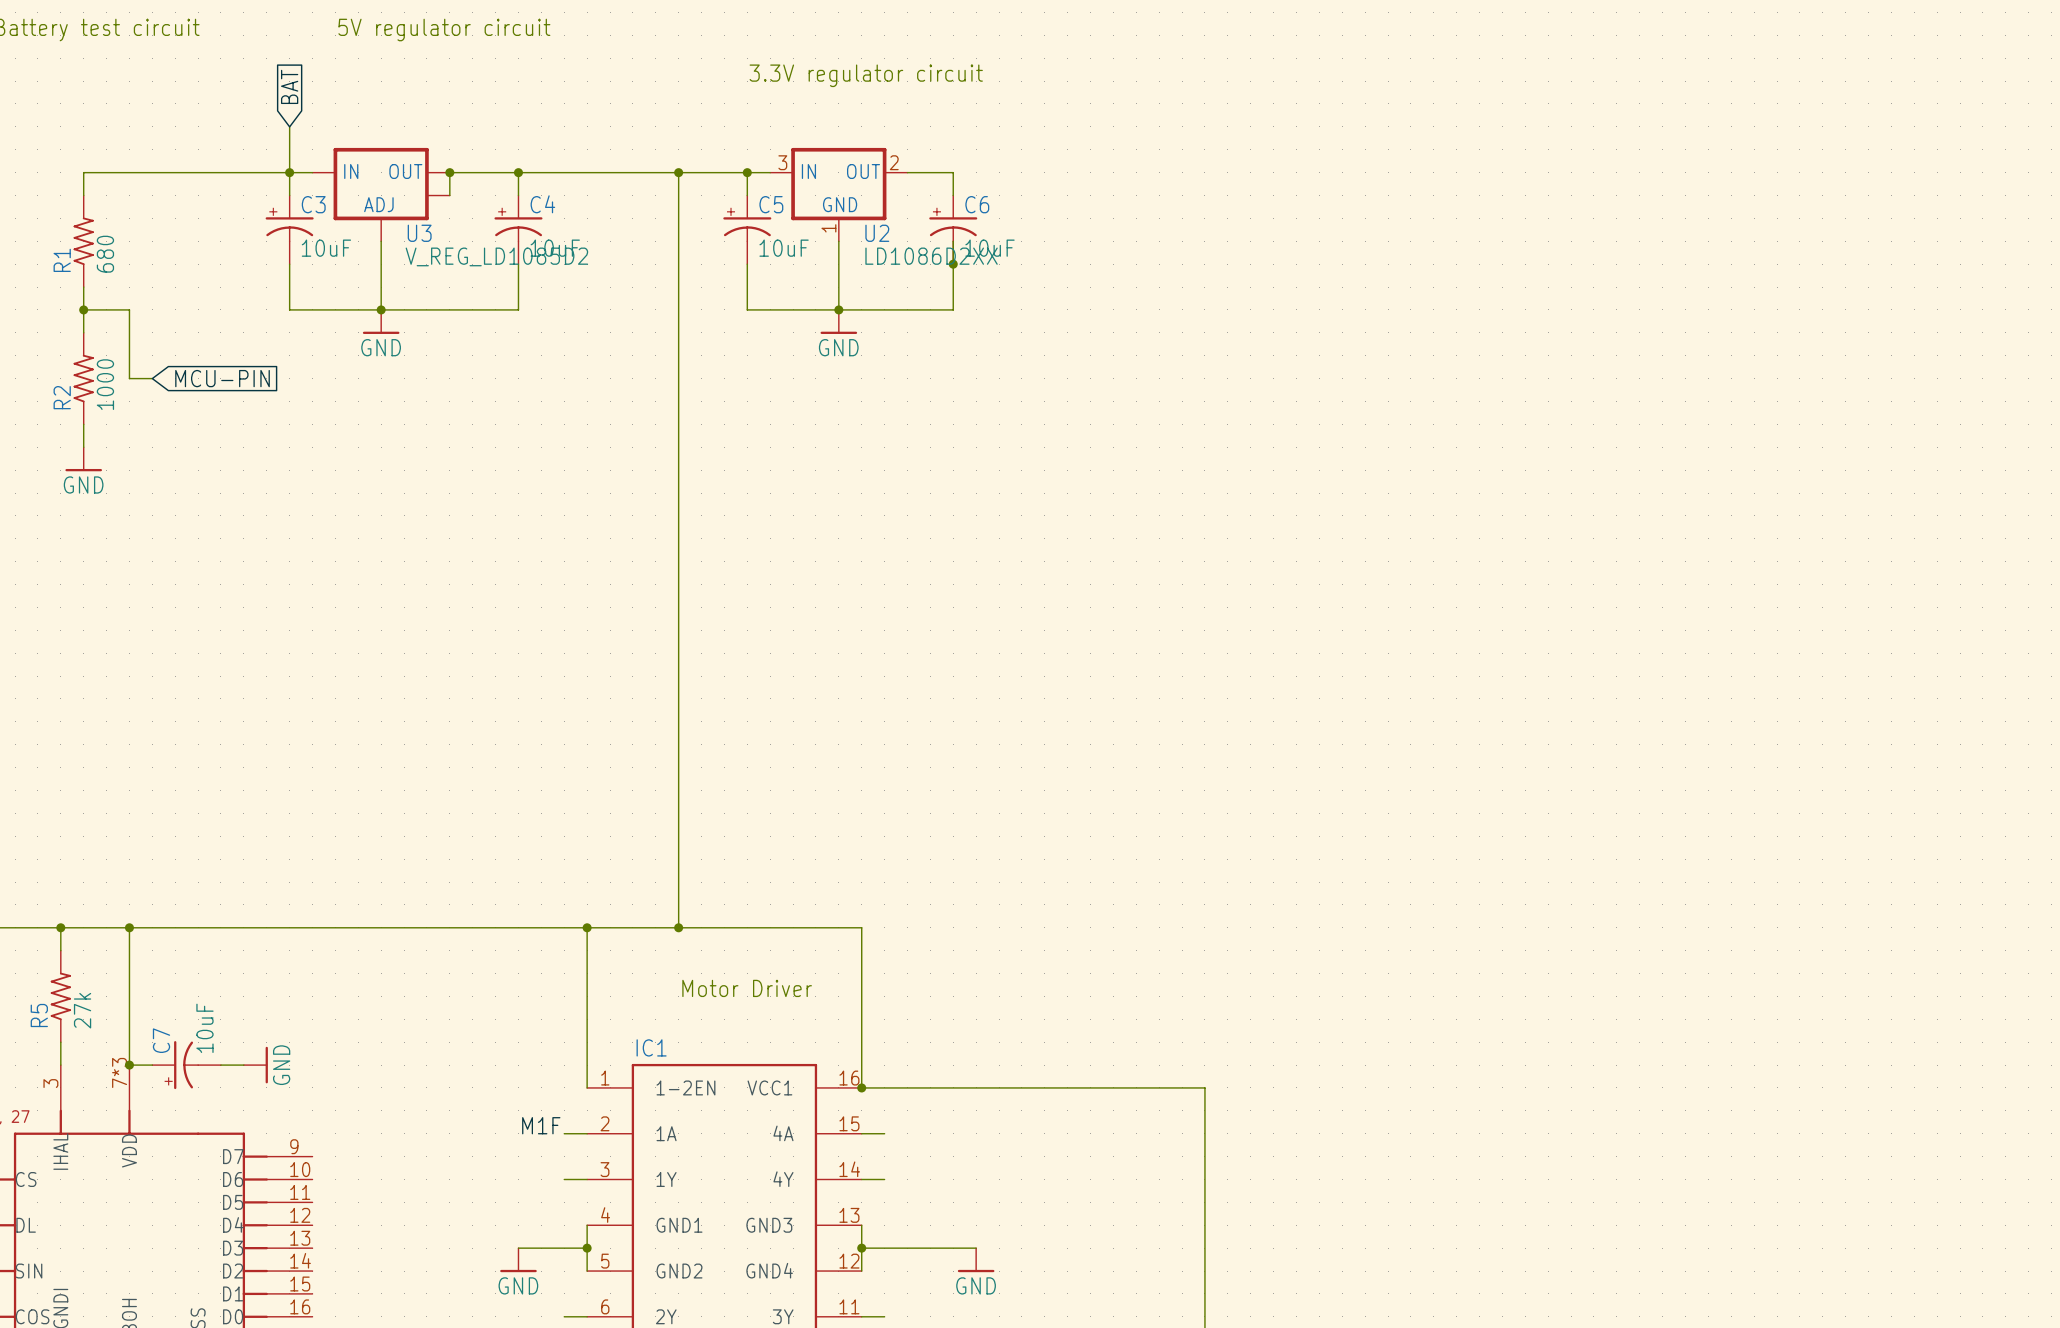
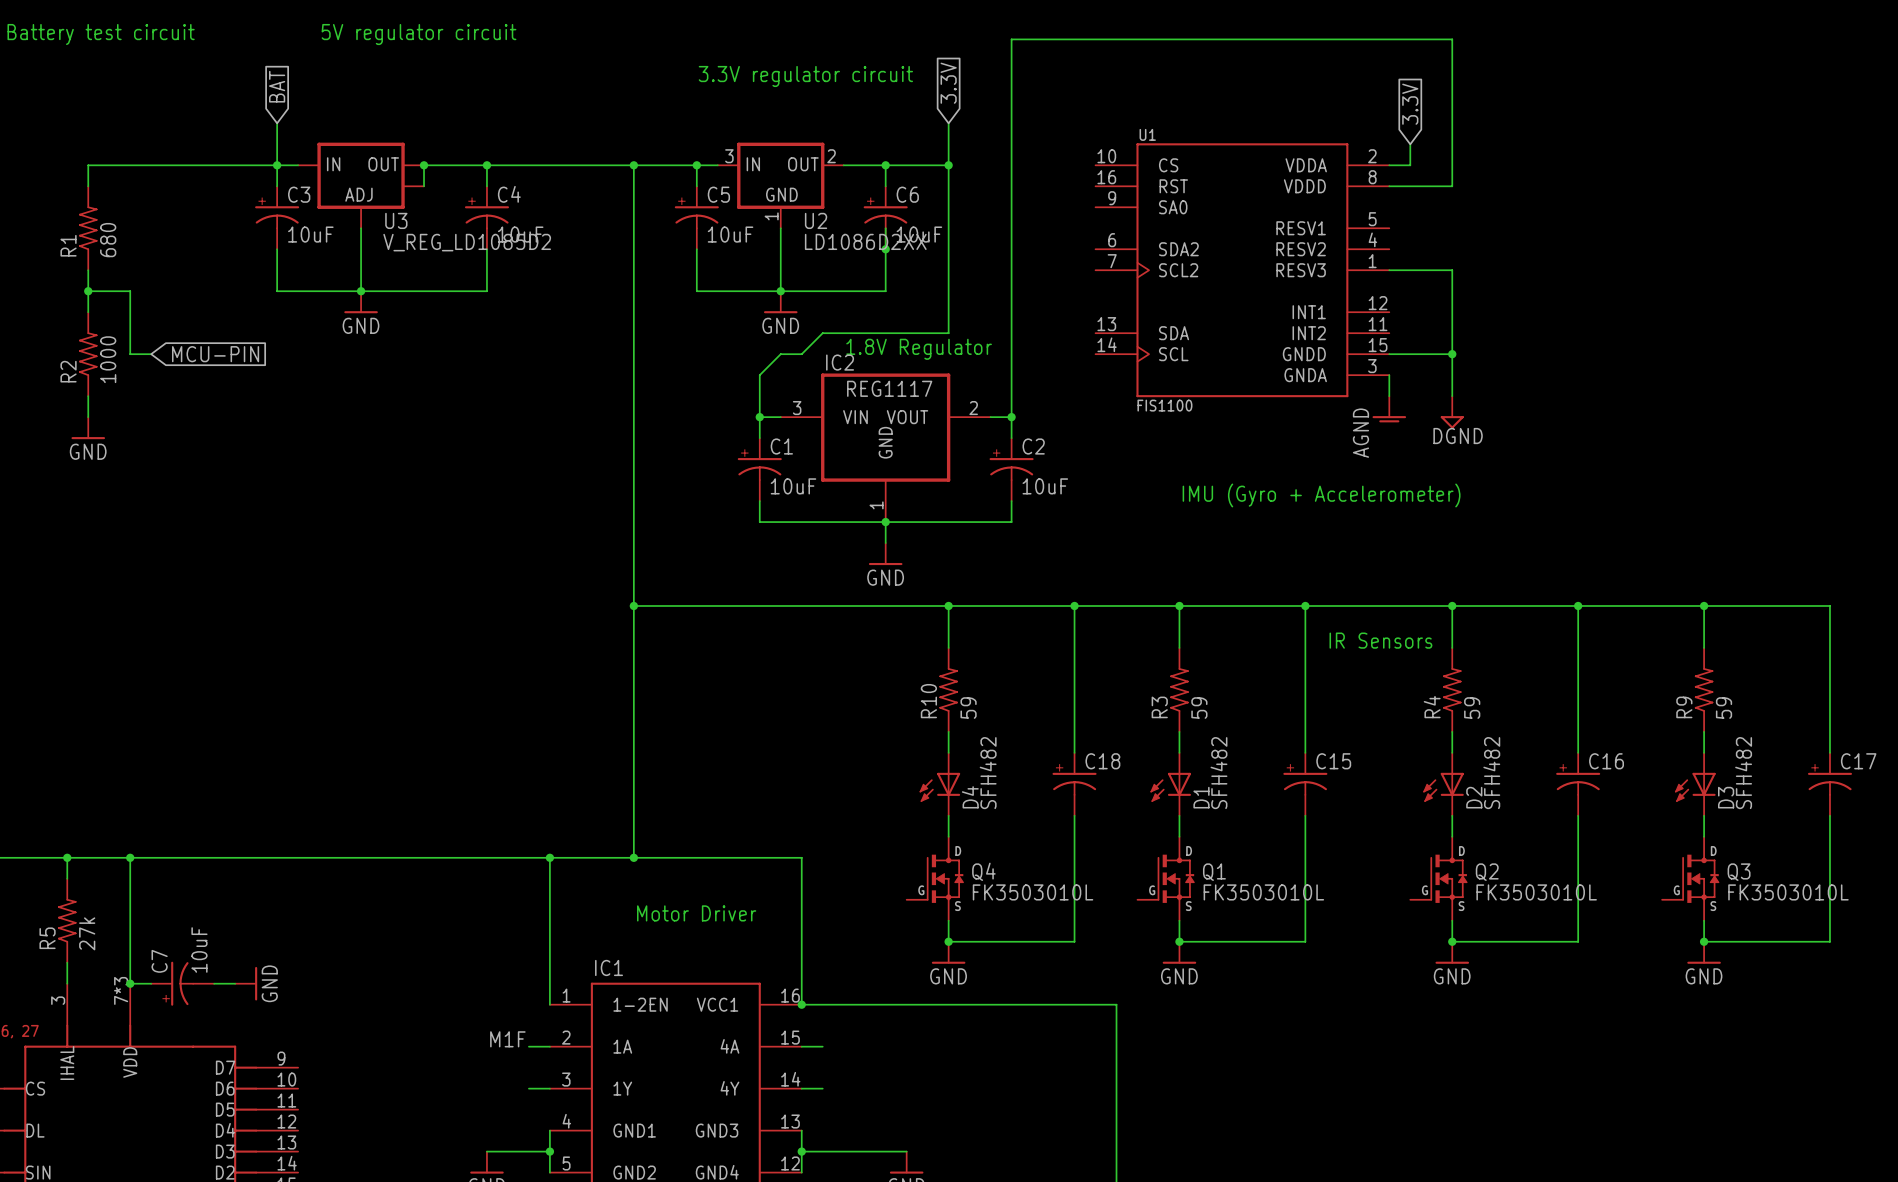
global label: none -> 3.3V (948, 83)
global label: none -> 3.3V (1410, 104)
wire: none -> (948, 123) (948, 333) (822, 333) (801, 354) (780, 354) (759, 375) (759, 438)
wire: none -> (1410, 144) (1410, 165) (1389, 165)
wire: none -> (885, 165) (948, 165)
junction: none -> (885, 165)
junction: none -> (948, 165)
wire: none -> (1389, 186) (1452, 186) (1452, 39) (1011, 39) (1011, 438)
U1: none -> FIS1100 (1242, 270)
wire: none -> (1389, 270) (1452, 270) (1452, 396)
text: none -> 1.8V Regulator (919, 349)
wire: none -> (1389, 354) (1452, 354)
junction: none -> (1452, 354)
wire: none -> (1389, 375) (1389, 396)
power symbol: none -> AGND (1389, 409)
power symbol: none -> DGND (1452, 412)
wire: none -> (759, 417) (780, 417)
junction: none -> (759, 417)
wire: none -> (990, 417) (1011, 417)
junction: none -> (1011, 417)
IC2: none -> REG1117 (885, 447)
C1: none -> 10uF (759, 469)
C2: none -> 10uF (1011, 469)
text: none -> IMU (Gyro + Accelerometer) (1321, 495)
wire: none -> (759, 501) (759, 522) (1011, 522) (1011, 501)
wire: none -> (885, 522) (885, 543)
junction: none -> (885, 522)
power symbol: none -> GND (885, 554)
wire: none -> (633, 605) (1829, 605) (1829, 752)
junction: none -> (633, 605)
wire: none -> (948, 605) (948, 647)
junction: none -> (948, 605)
wire: none -> (1074, 605) (1074, 752)
junction: none -> (1074, 605)
wire: none -> (1179, 605) (1179, 647)
junction: none -> (1179, 605)
wire: none -> (1305, 605) (1305, 752)
junction: none -> (1305, 605)
wire: none -> (1452, 605) (1452, 647)
junction: none -> (1452, 605)
wire: none -> (1578, 605) (1578, 752)
junction: none -> (1578, 605)
wire: none -> (1704, 605) (1704, 647)
junction: none -> (1704, 605)
text: none -> IR Sensors (1380, 640)
R10: none -> 59 (948, 689)
R3: none -> 59 (1179, 689)
R4: none -> 59 (1452, 689)
R9: none -> 59 (1704, 689)
wire: none -> (948, 731) (948, 752)
wire: none -> (1179, 731) (1179, 752)
wire: none -> (1452, 731) (1452, 752)
wire: none -> (1704, 731) (1704, 752)
D4: none -> SFH482 (939, 784)
C18: none -> (1074, 784)
D1: none -> SFH482 (1170, 784)
C15: none -> (1305, 784)
D2: none -> SFH482 (1443, 784)
C16: none -> (1578, 784)
D3: none -> SFH482 (1695, 784)
C17: none -> (1829, 784)
wire: none -> (948, 815) (948, 836)
wire: none -> (1074, 815) (1074, 941) (948, 941) (948, 920)
wire: none -> (1179, 815) (1179, 836)
wire: none -> (1305, 815) (1305, 941) (1179, 941) (1179, 920)
wire: none -> (1452, 815) (1452, 836)
wire: none -> (1578, 815) (1578, 941) (1452, 941) (1452, 920)
wire: none -> (1704, 815) (1704, 836)
wire: none -> (1829, 815) (1829, 941) (1704, 941) (1704, 920)
Q4: none -> FK3503010L (935, 878)
Q1: none -> FK3503010L (1166, 878)
Q2: none -> FK3503010L (1438, 878)
Q3: none -> FK3503010L (1690, 878)
junction: none -> (948, 941)
junction: none -> (1179, 941)
junction: none -> (1452, 941)
junction: none -> (1704, 941)
power symbol: none -> GND (948, 952)
power symbol: none -> GND (1179, 952)
power symbol: none -> GND (1452, 952)
power symbol: none -> GND (1704, 952)

